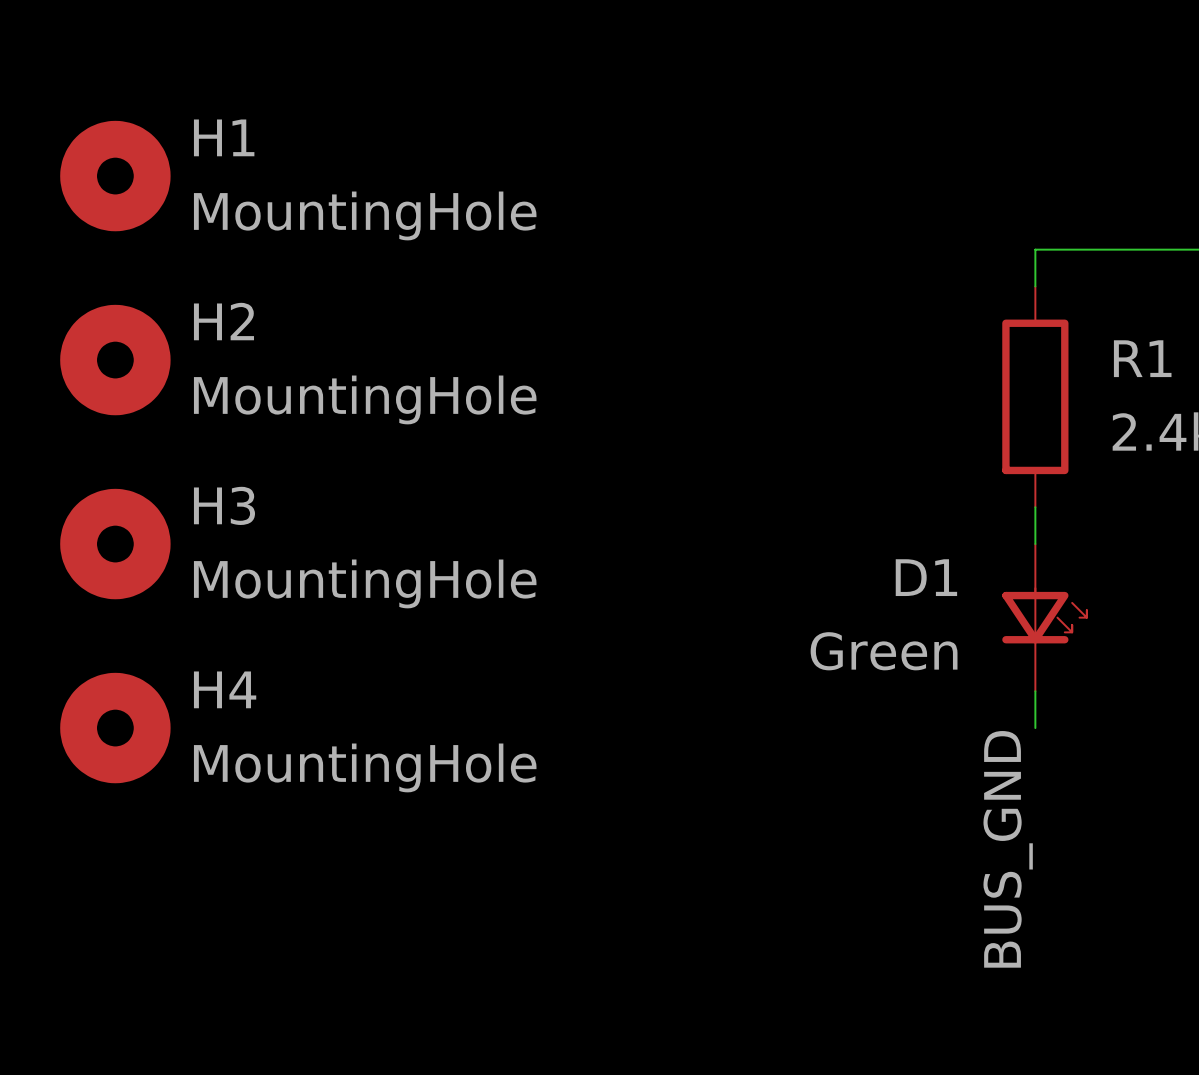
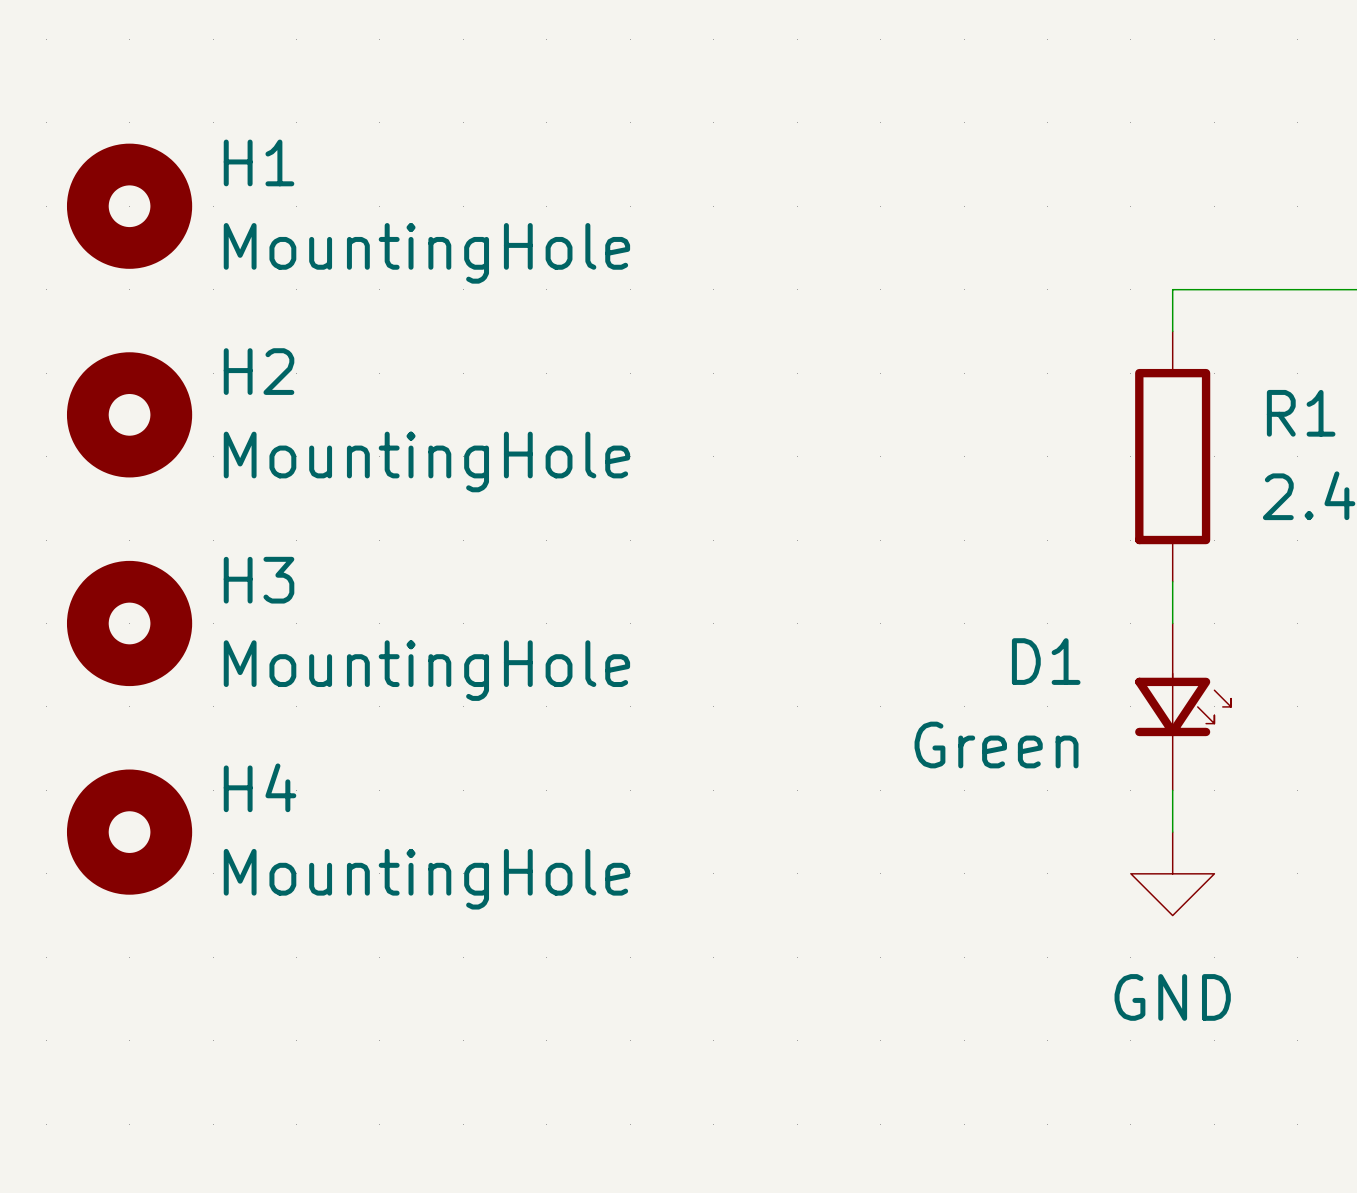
power symbol: none -> GND (1172, 873)
label: BUS_GND (1008, 849) -> none

